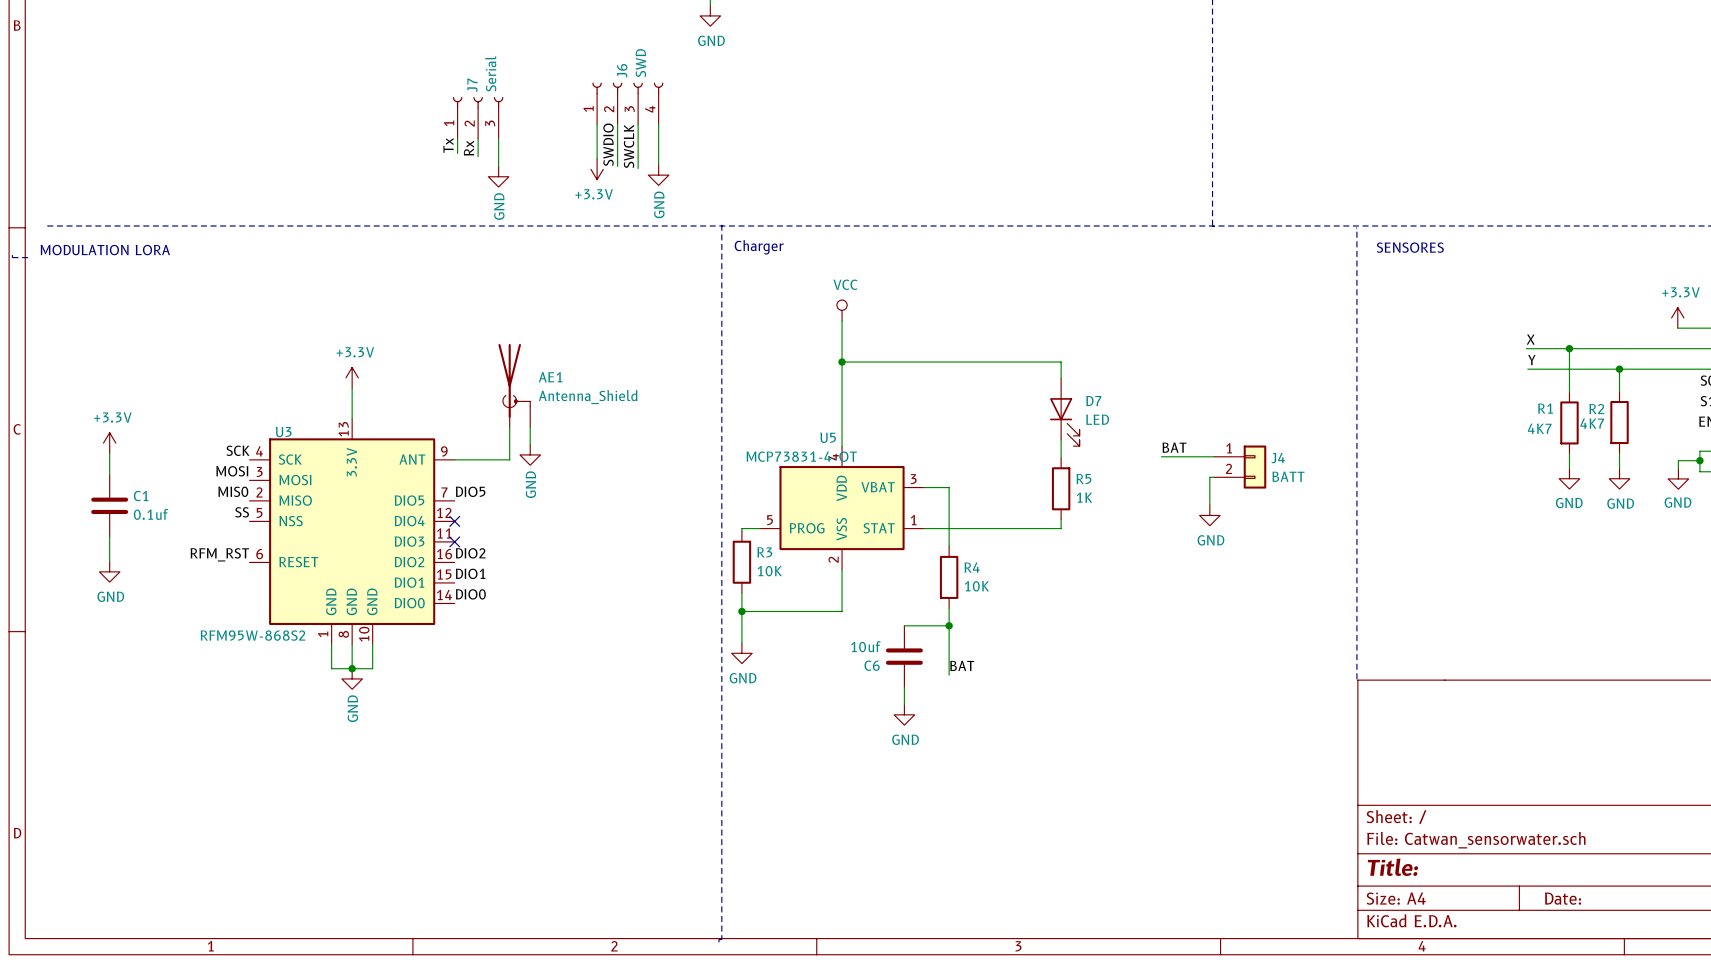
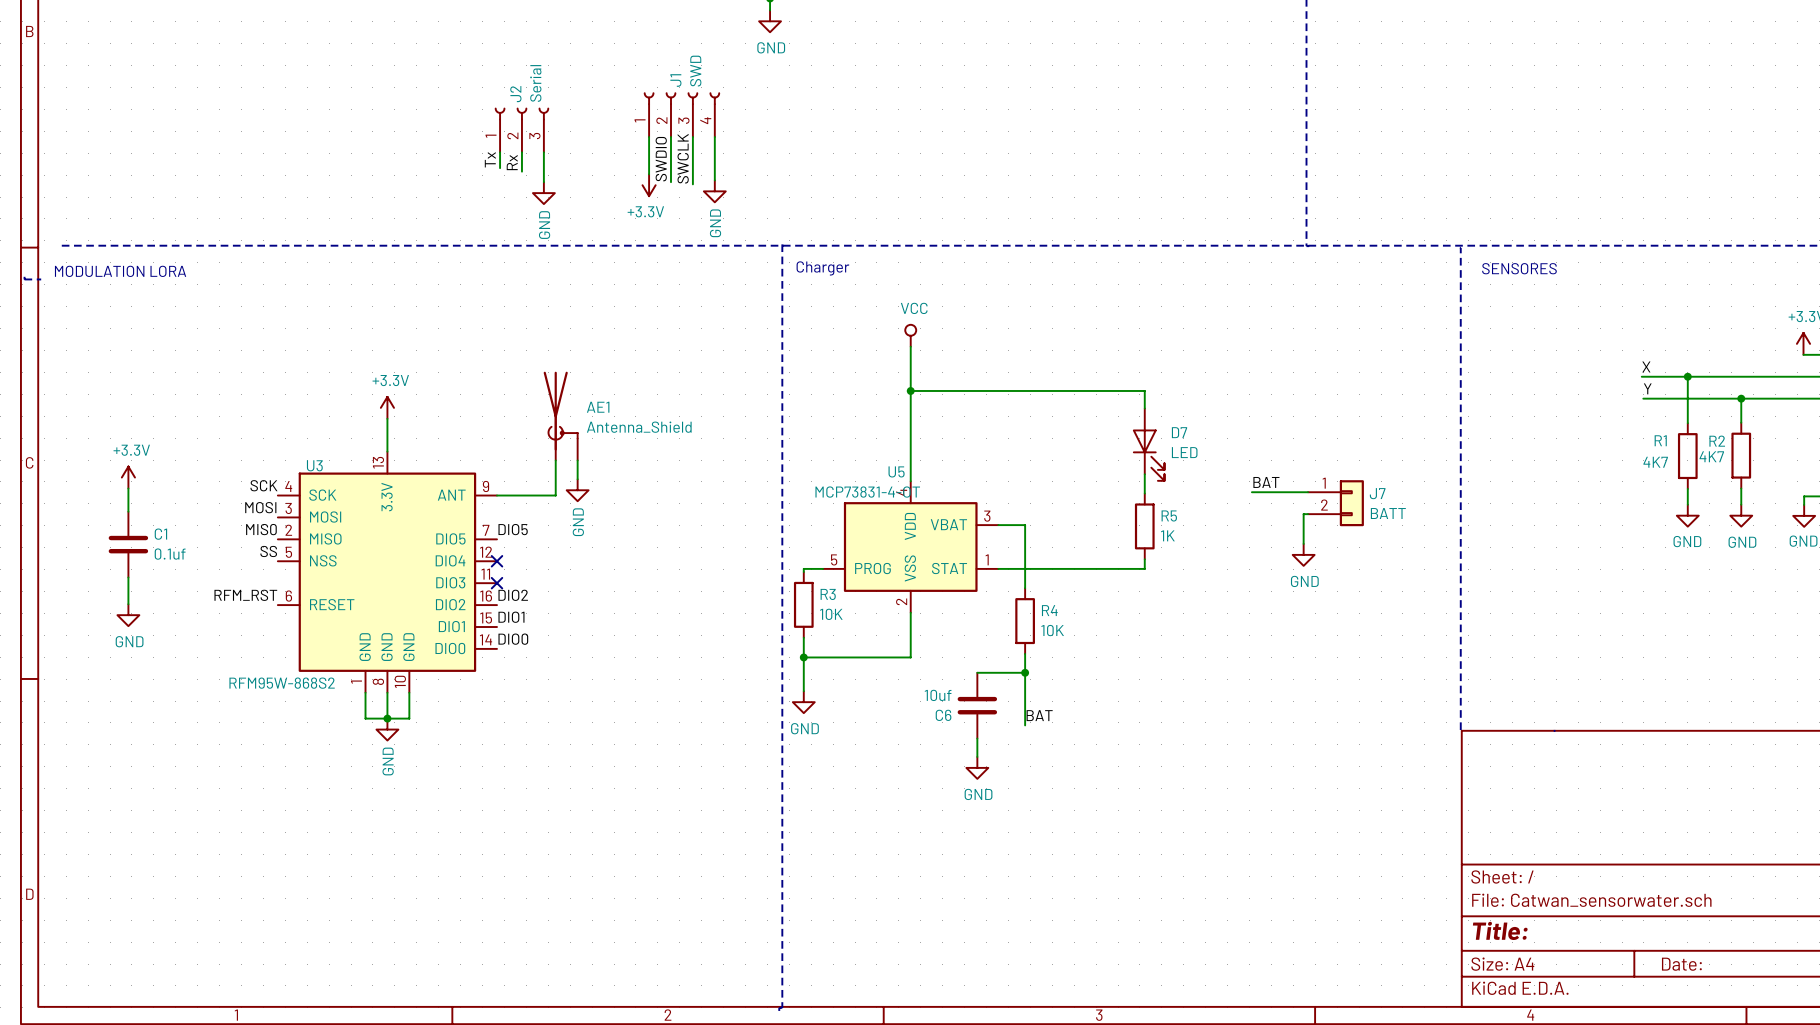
J6 name: J6 (622, 70) -> J1 (675, 80)
J7 name: J7 (472, 85) -> J2 (515, 94)
J4 name: J4 (1278, 458) -> J7 (1377, 493)

